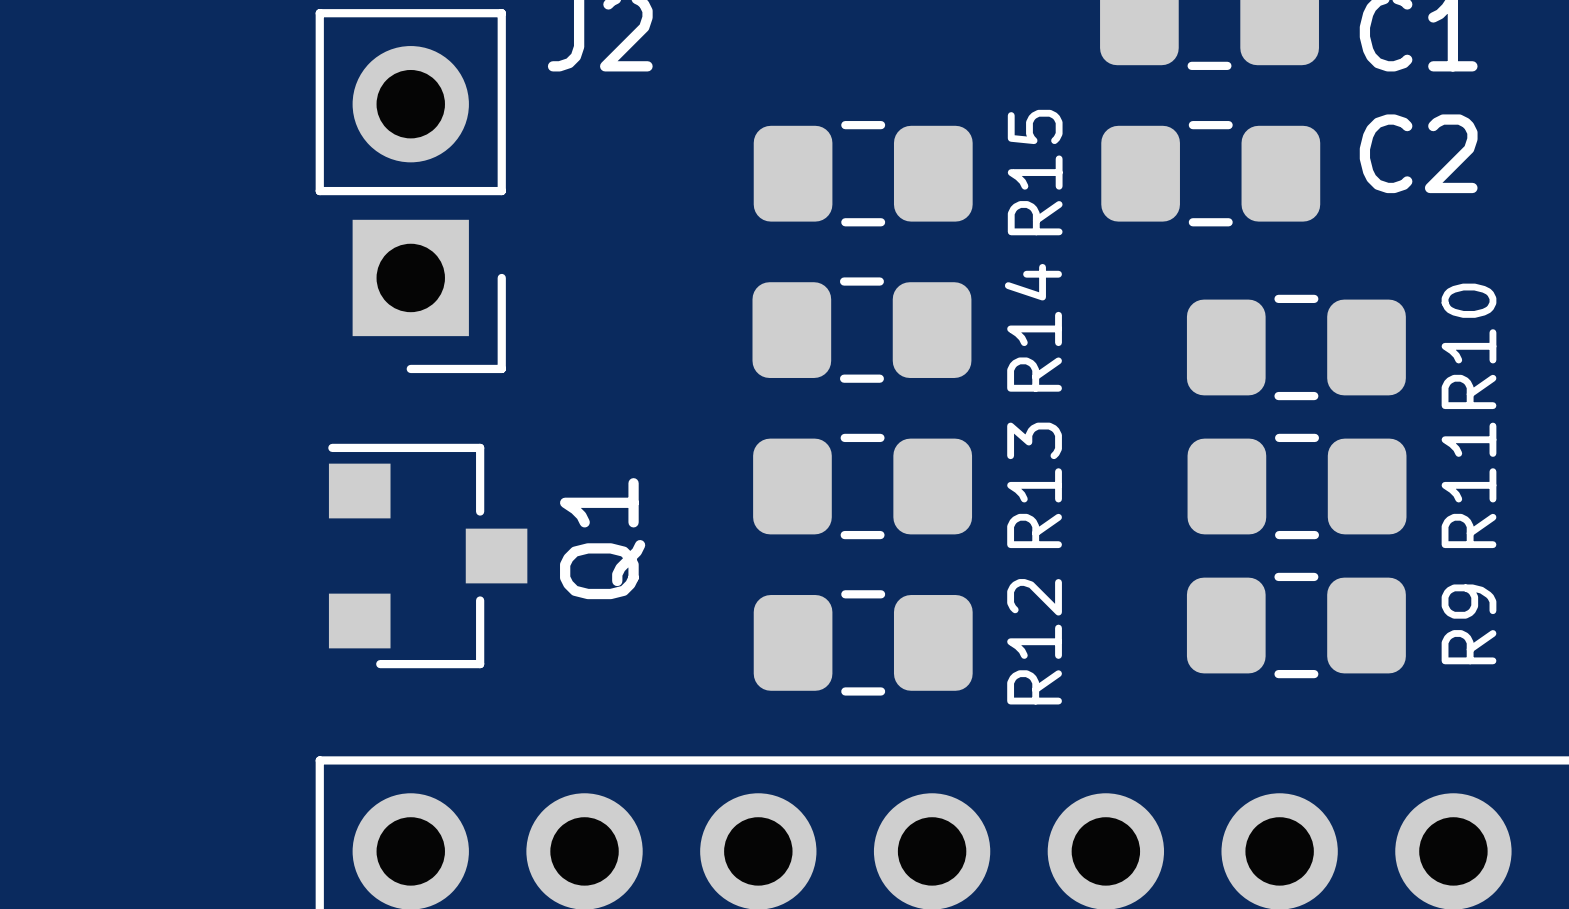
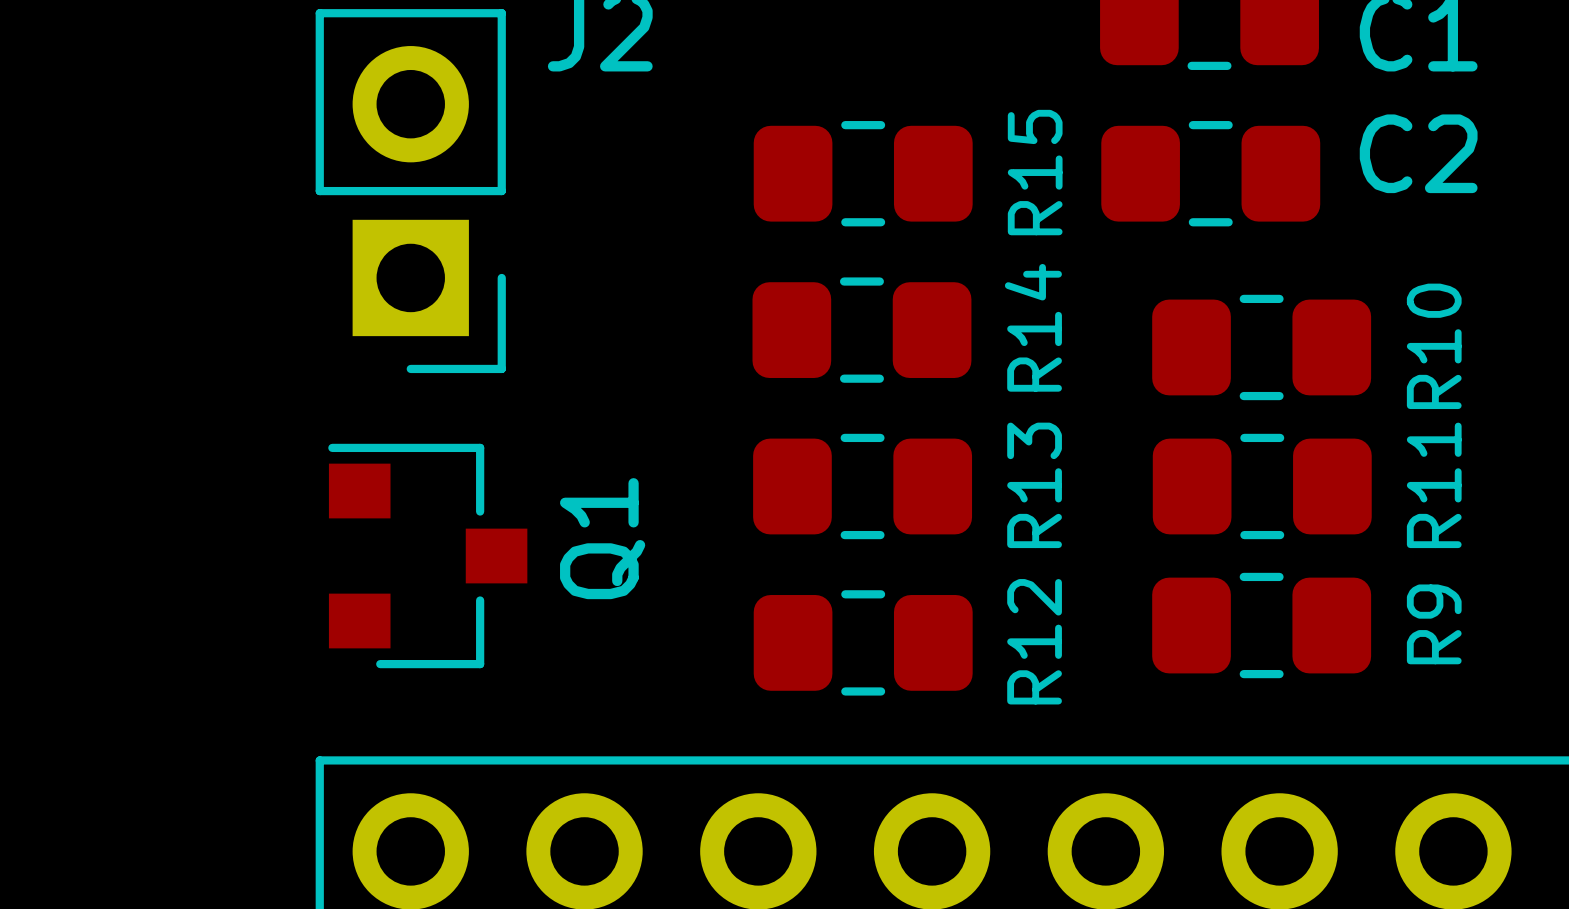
R10 position: (1296, 347) -> (1261, 347)
R11 position: (1297, 486) -> (1262, 486)
R9 position: (1296, 625) -> (1261, 625)

